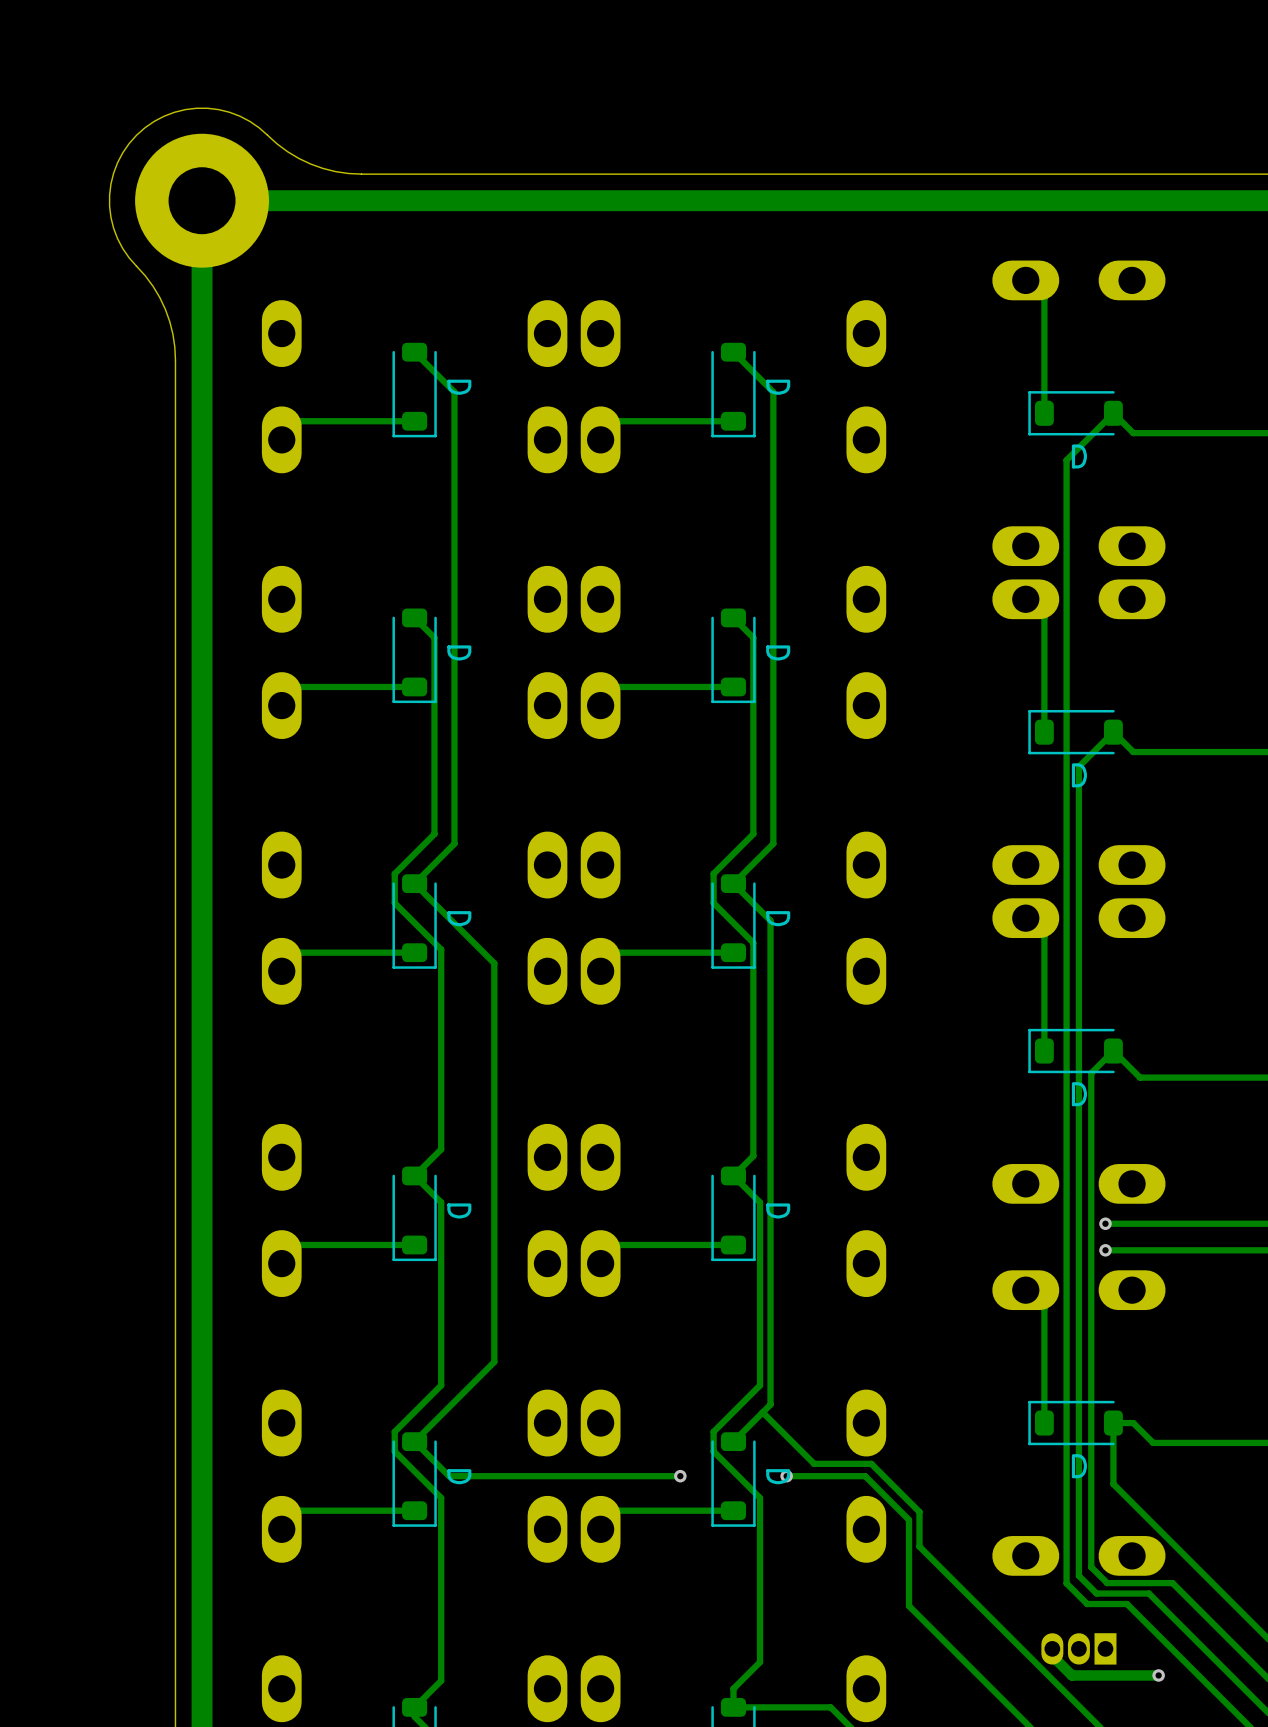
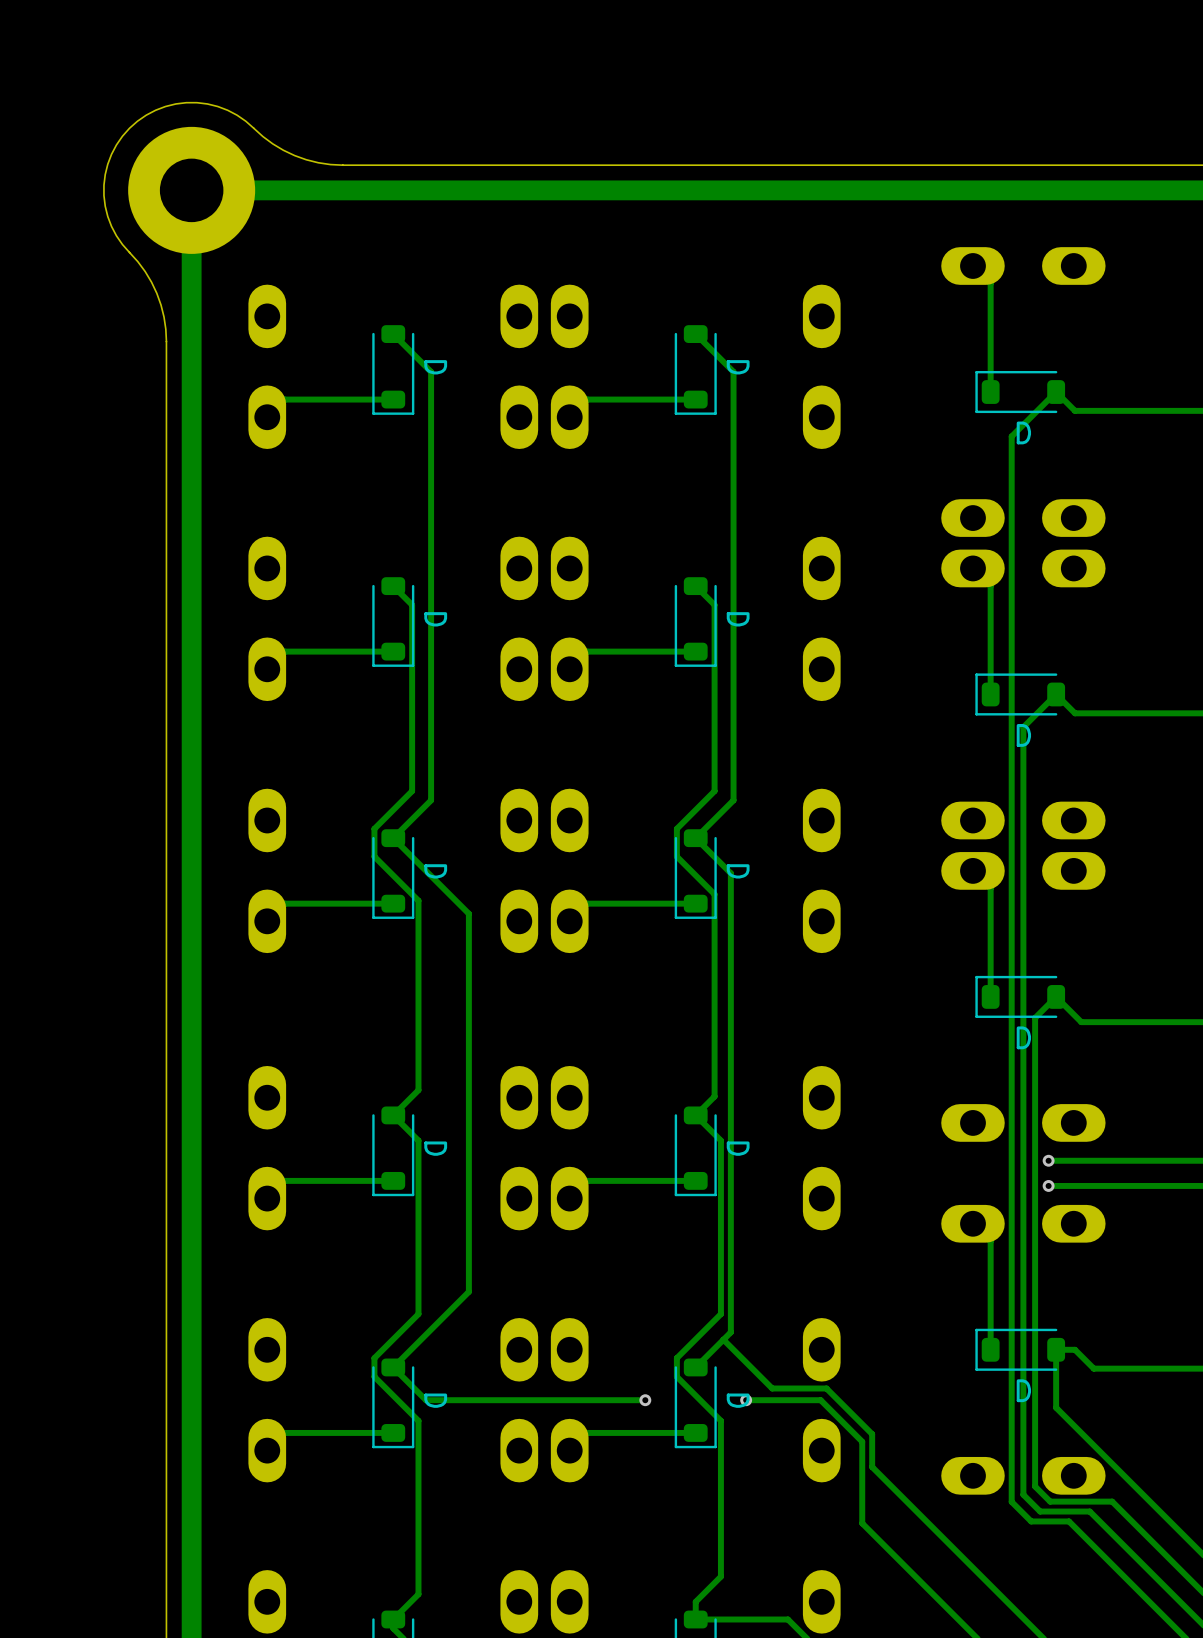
part: (1078, 1648) -> none
track: (1052, 1655) (1071, 1675) (1158, 1675) -> none
via: (1158, 1675) -> none

